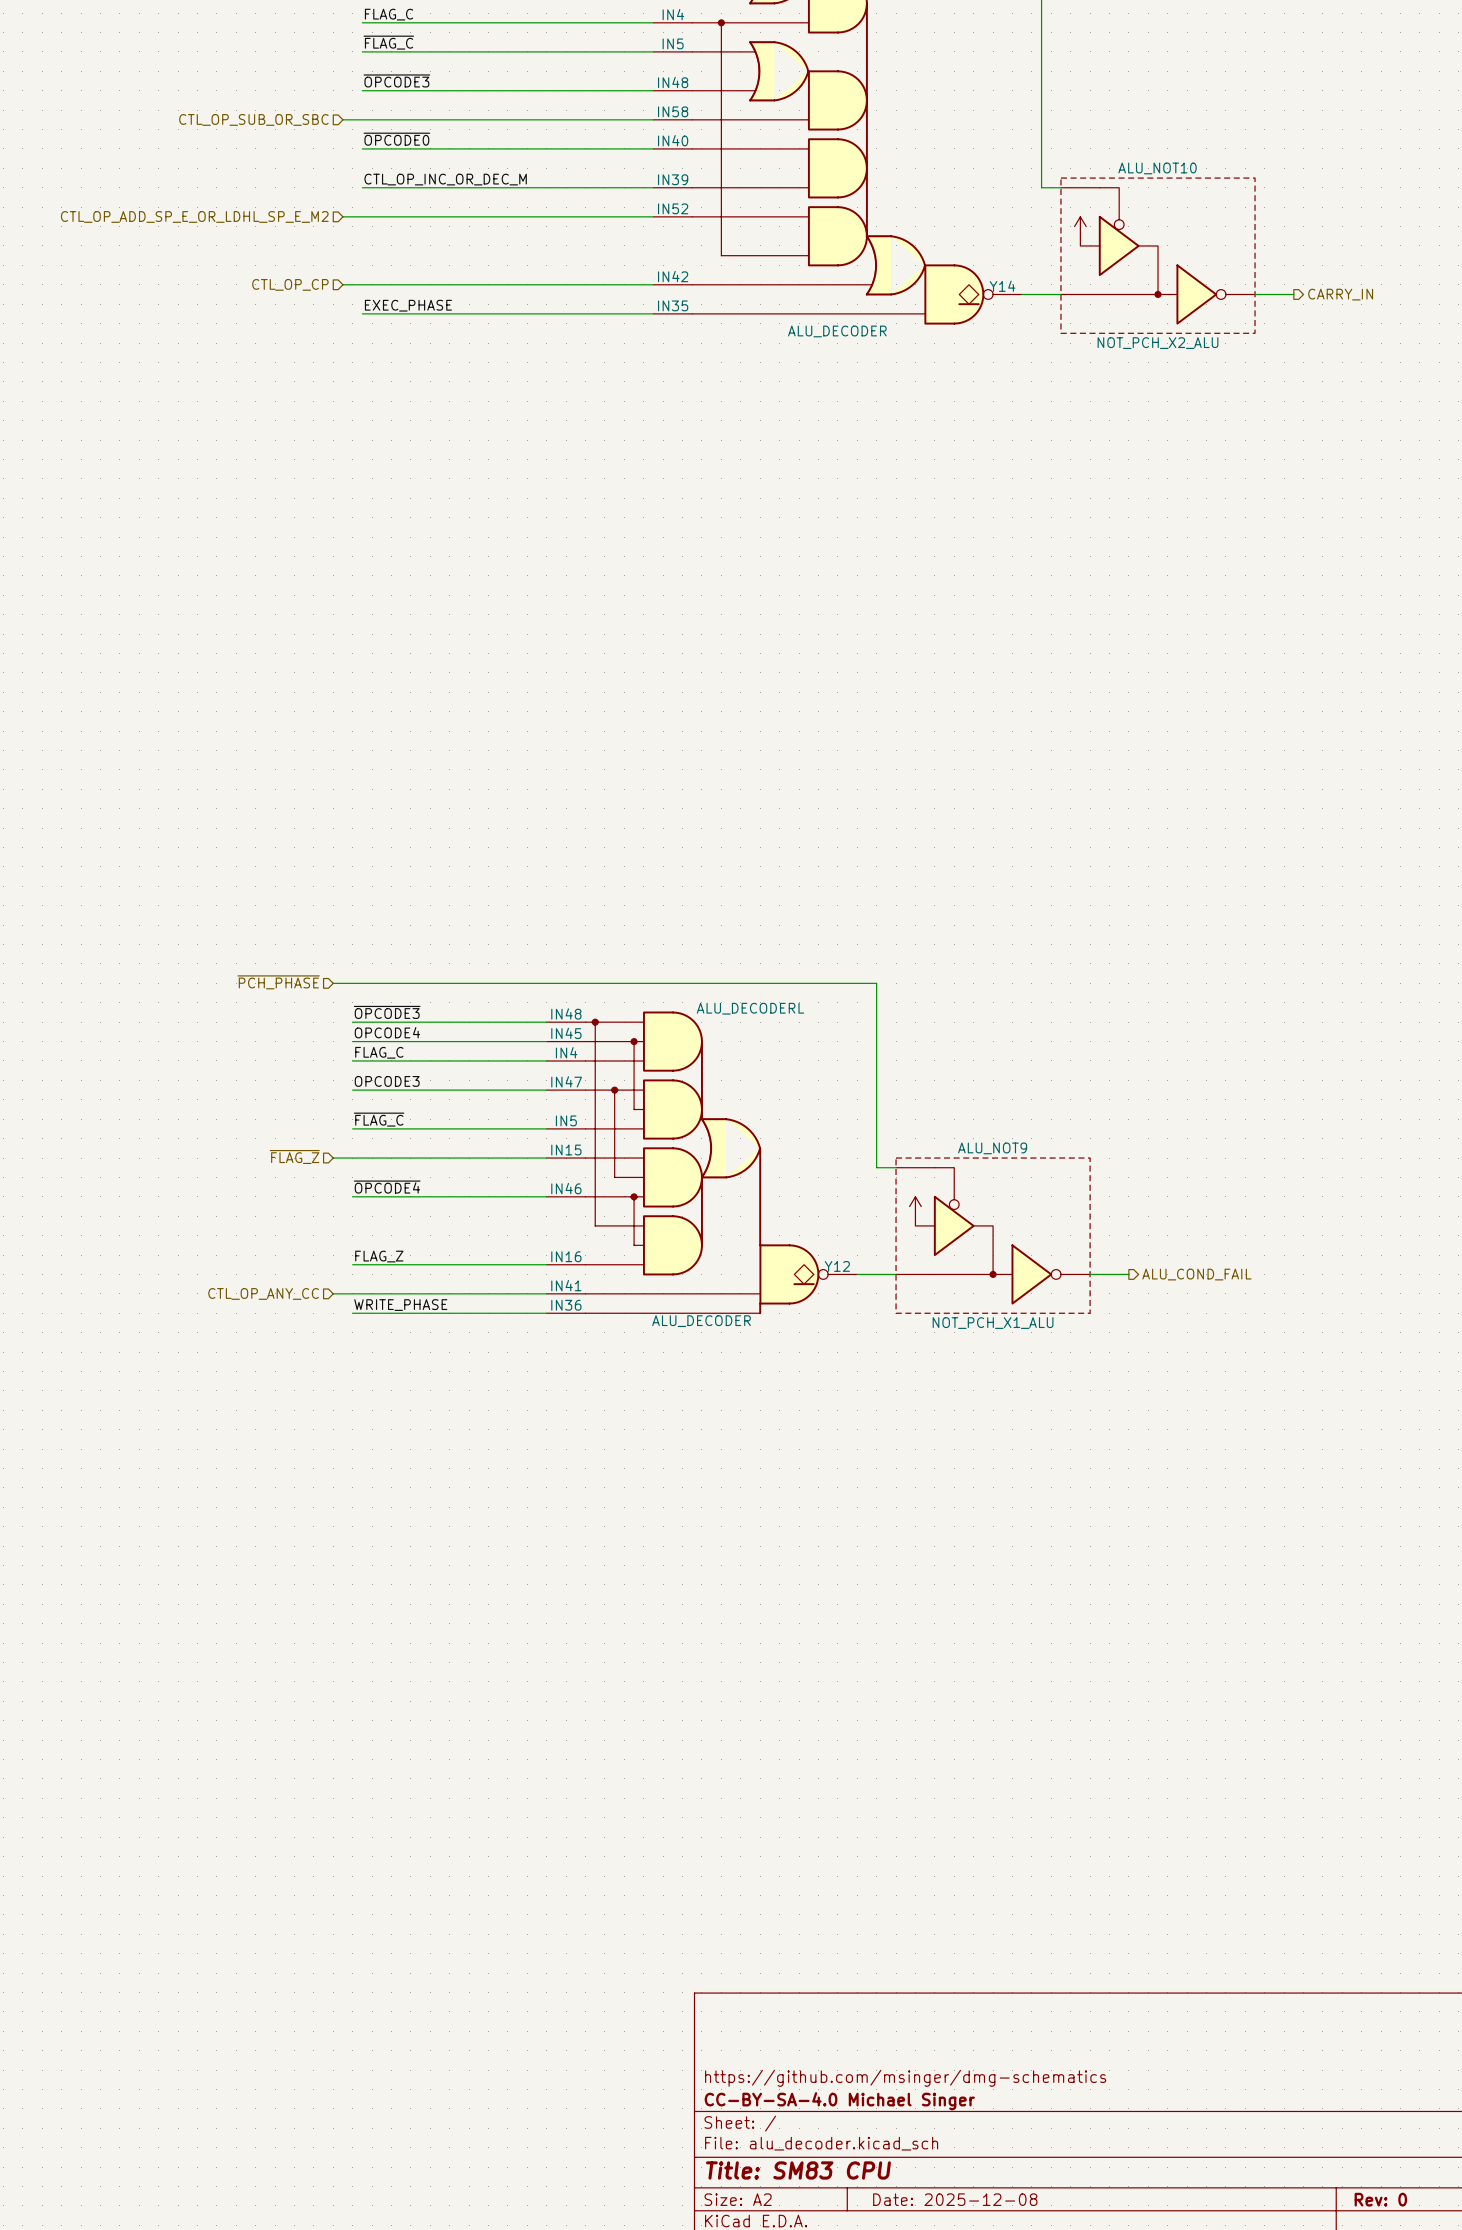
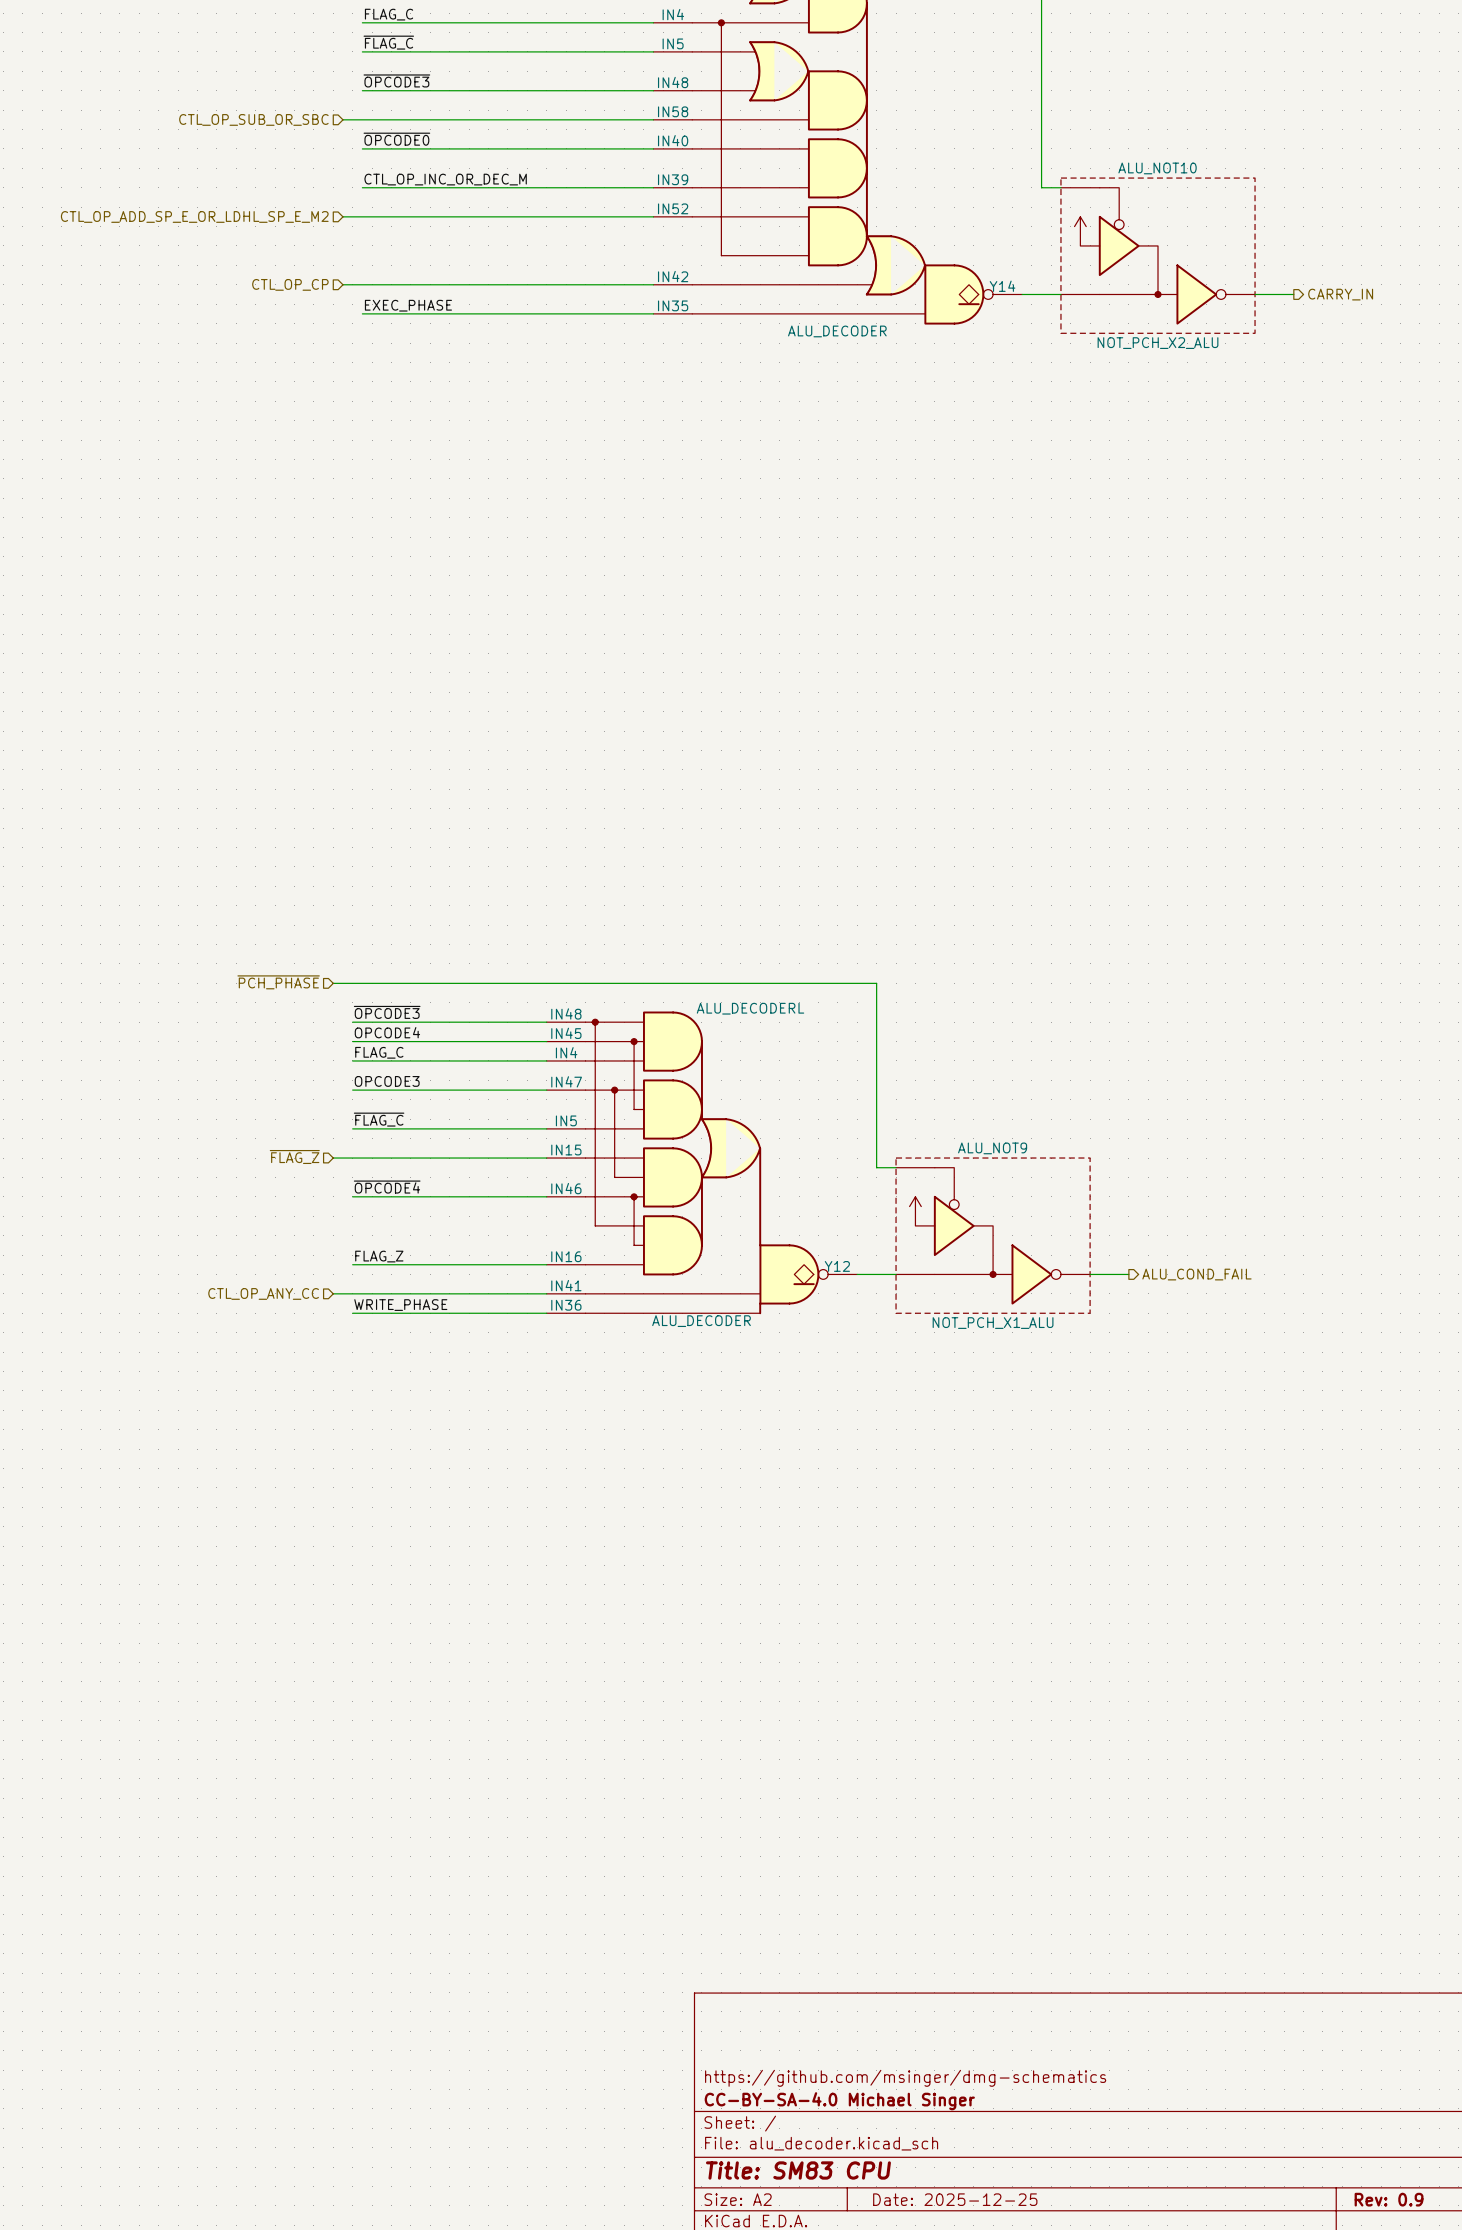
title block: Date: 2025-12-08 (955, 2199) -> Date: 2025-12-25 (955, 2199)
title block: Rev: 0 (1380, 2199) -> Rev: 0.9 (1389, 2199)

